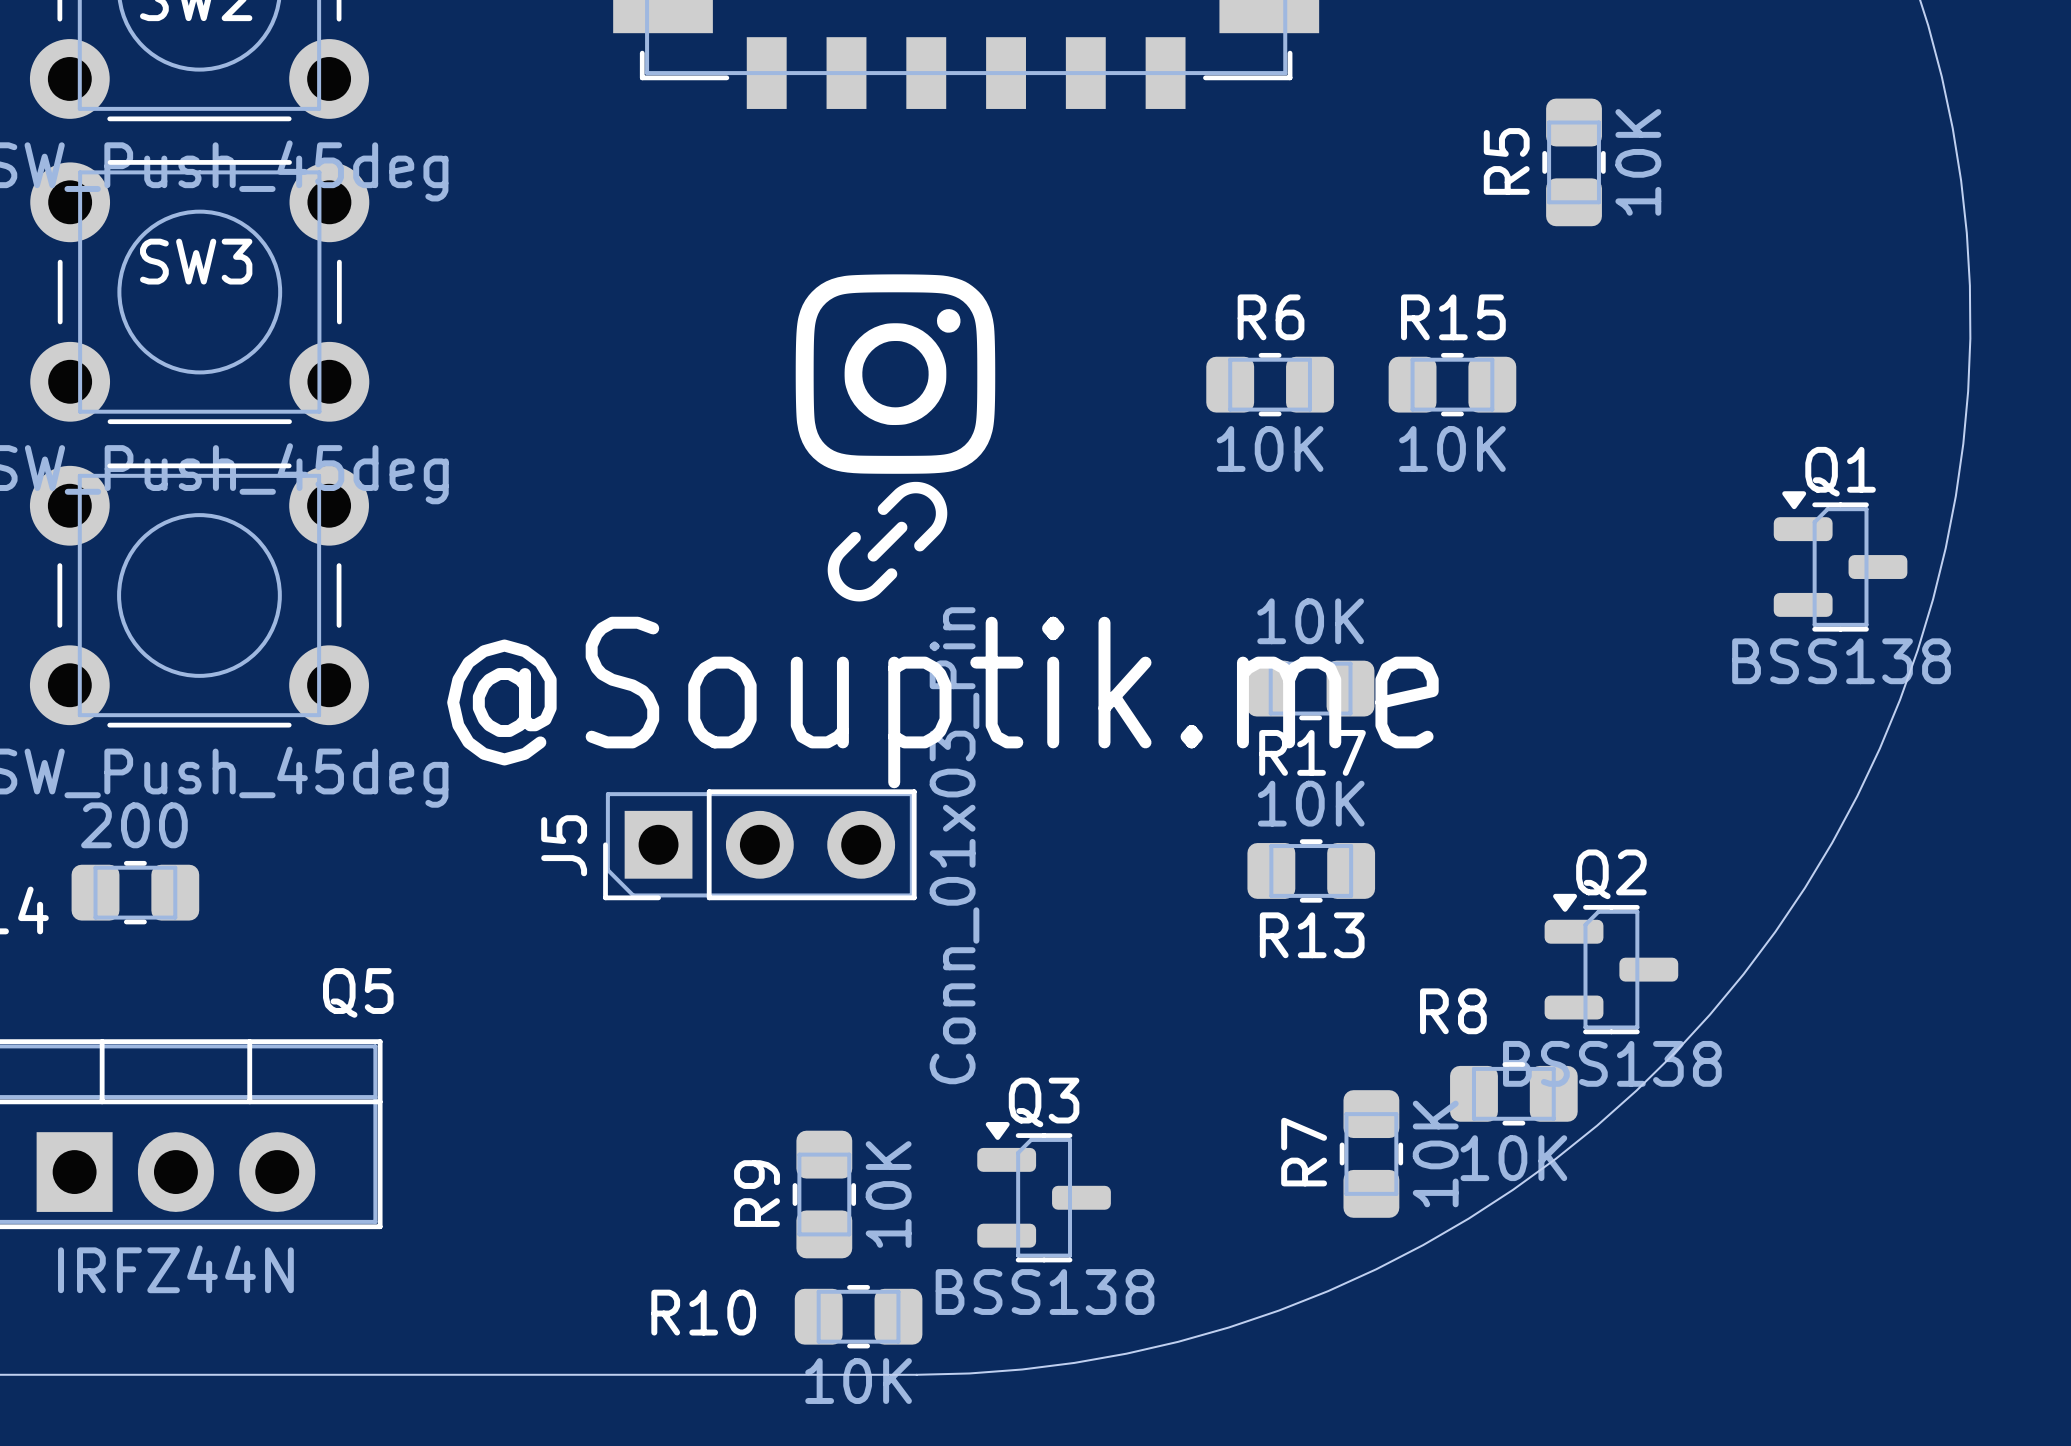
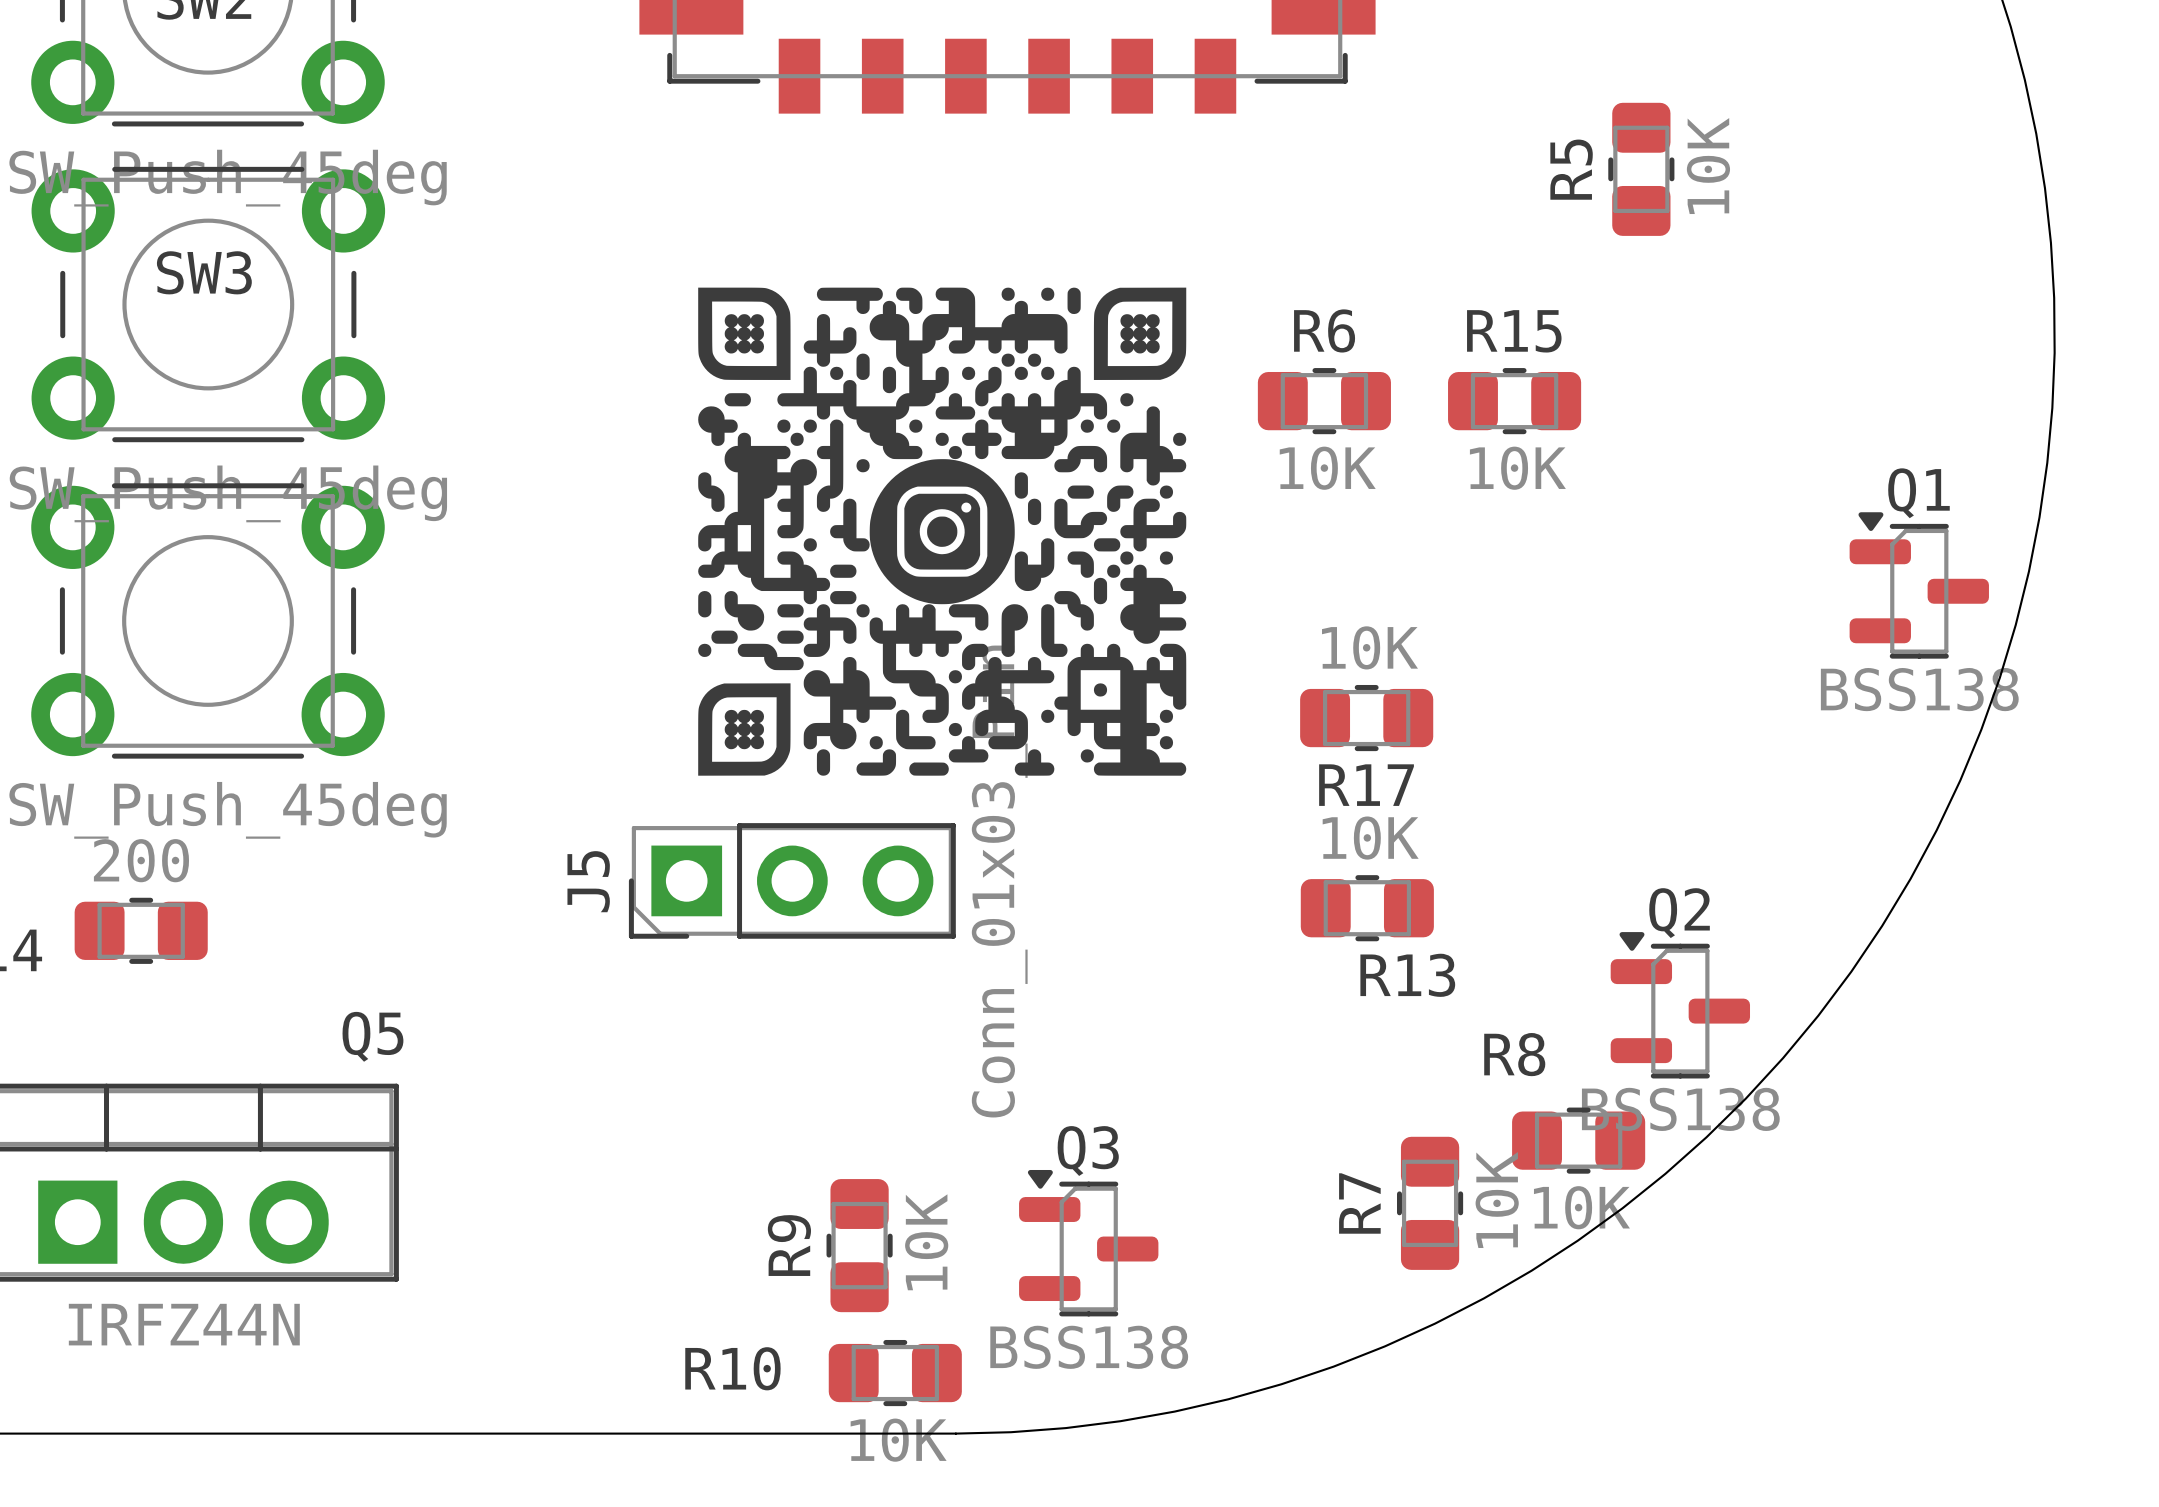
drawing: [795, 274, 996, 474] -> none
drawing shape: [827, 481, 948, 602] -> [698, 287, 1187, 776]
text: @Souptik.me (942, 702) -> none
R13 name position: R13 (1312, 935) -> R13 (1407, 975)

